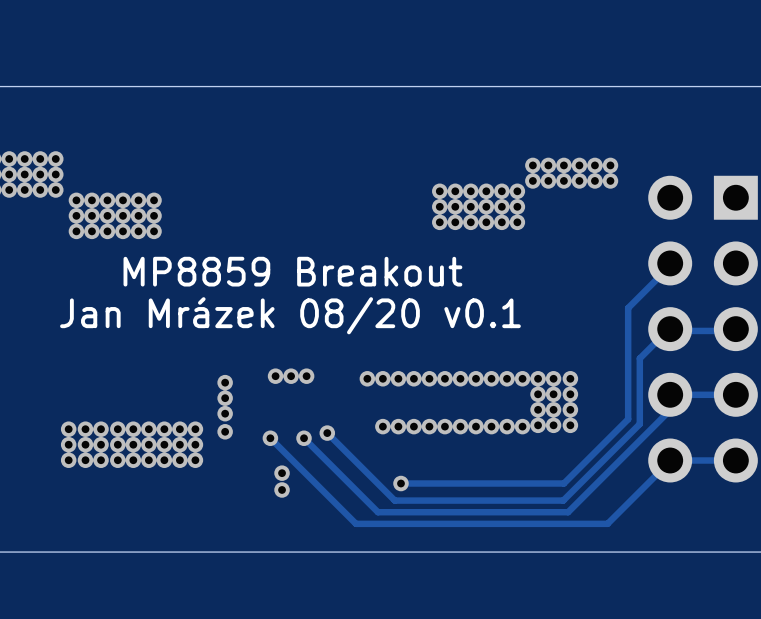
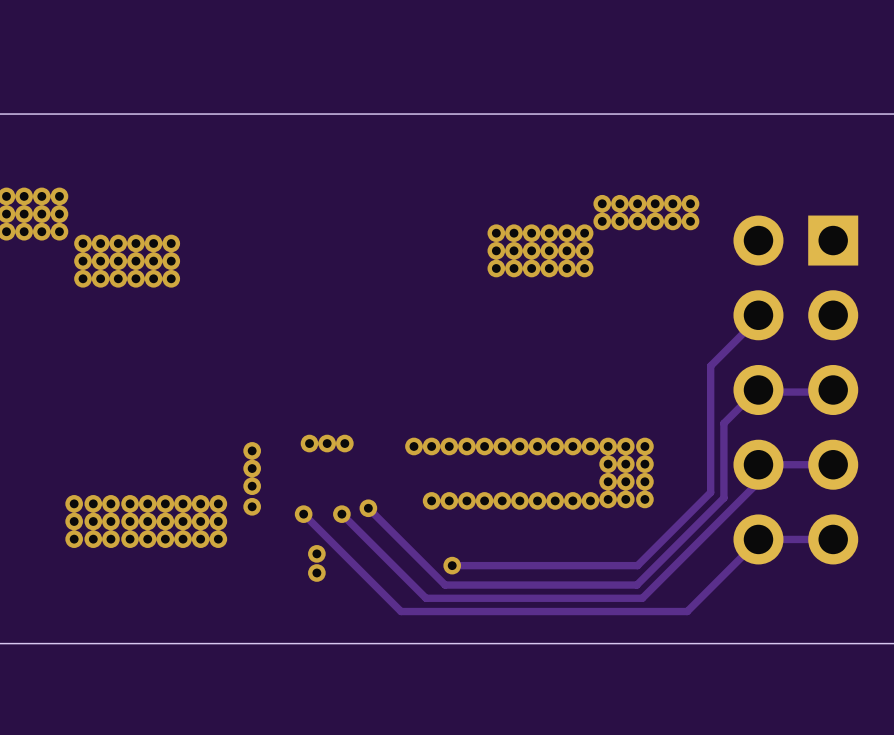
text: MP8859 Breakout (292, 271) -> none
text: Jan Mrázek 08/20 v0.1 (290, 315) -> none

